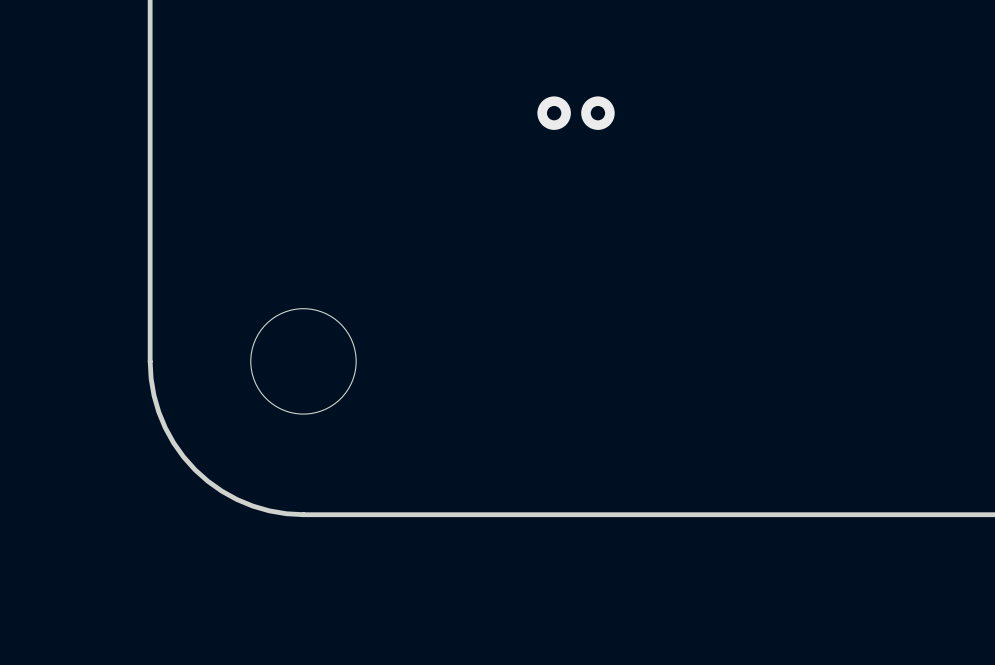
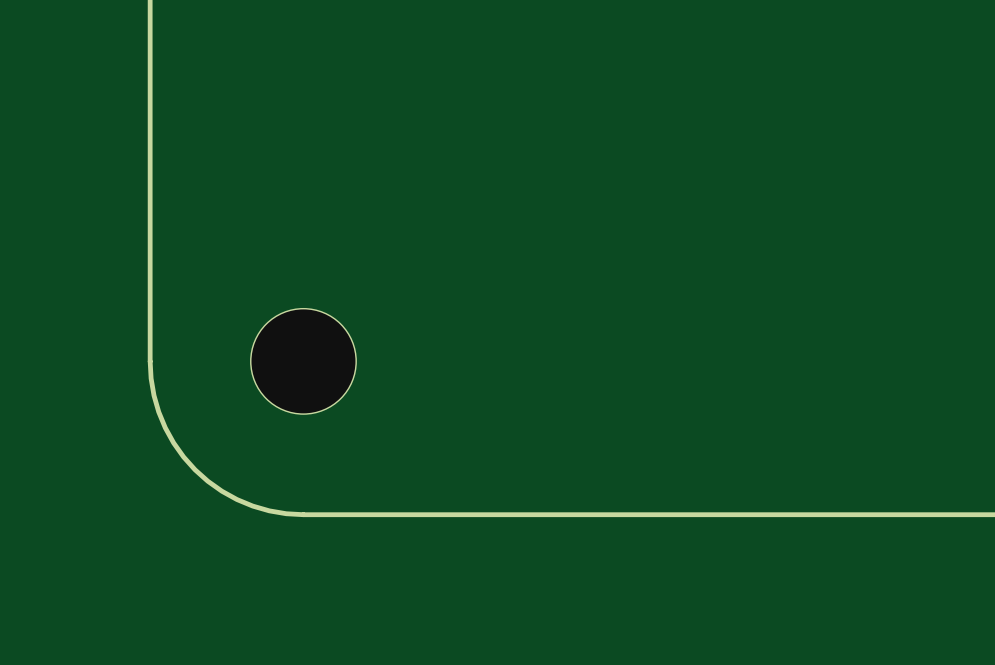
via: (554, 113) -> none
via: (597, 113) -> none

